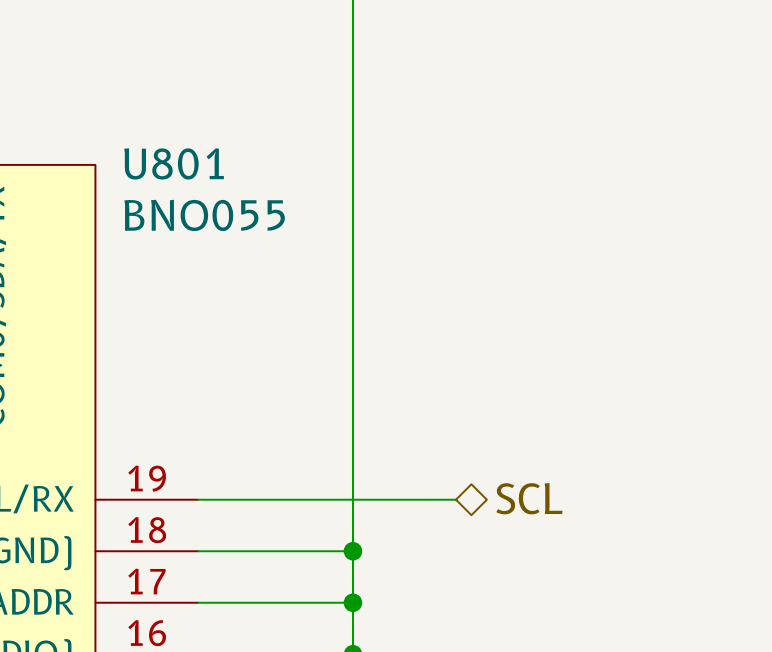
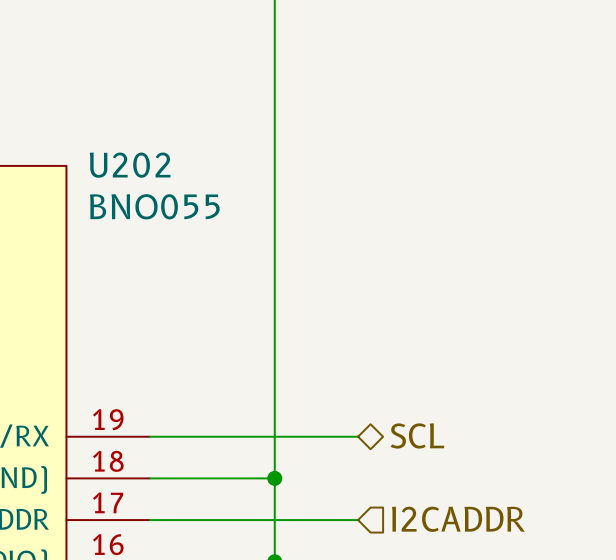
U801 name: U801 (174, 163) -> U202 (130, 165)
hierarchical label: none -> I2CADDR (458, 519)
wire: none -> (274, 520) (358, 520)
junction: (352, 602) -> none

